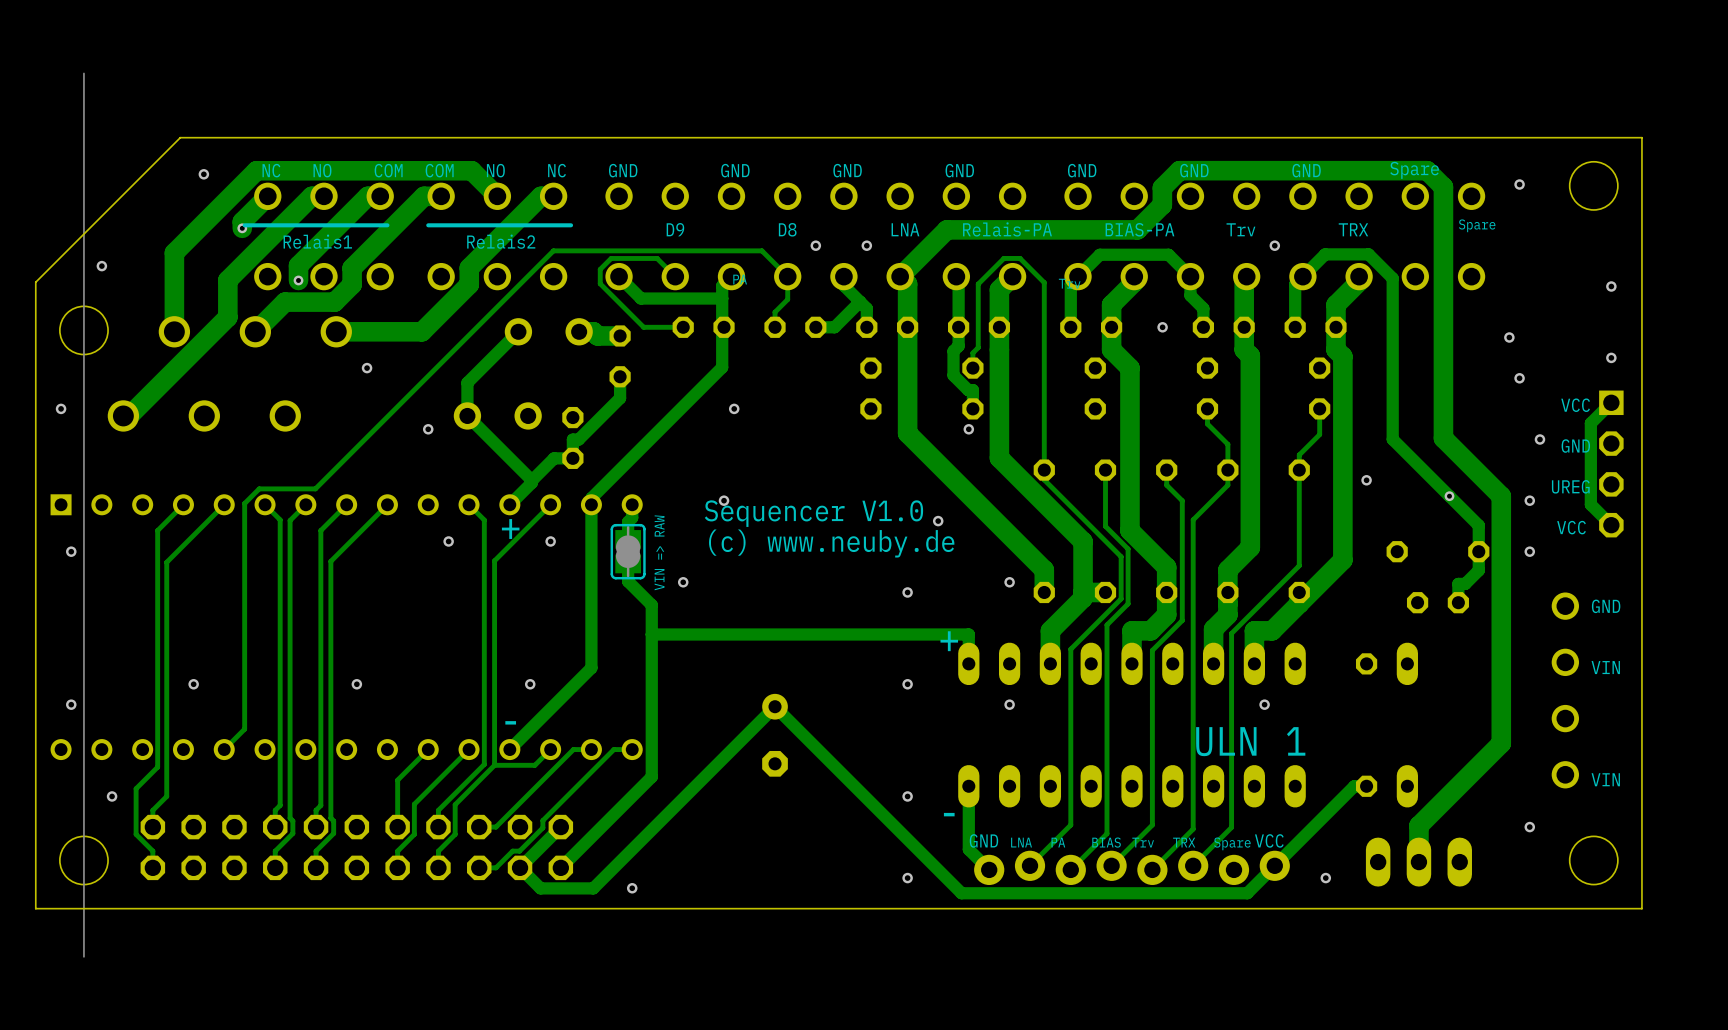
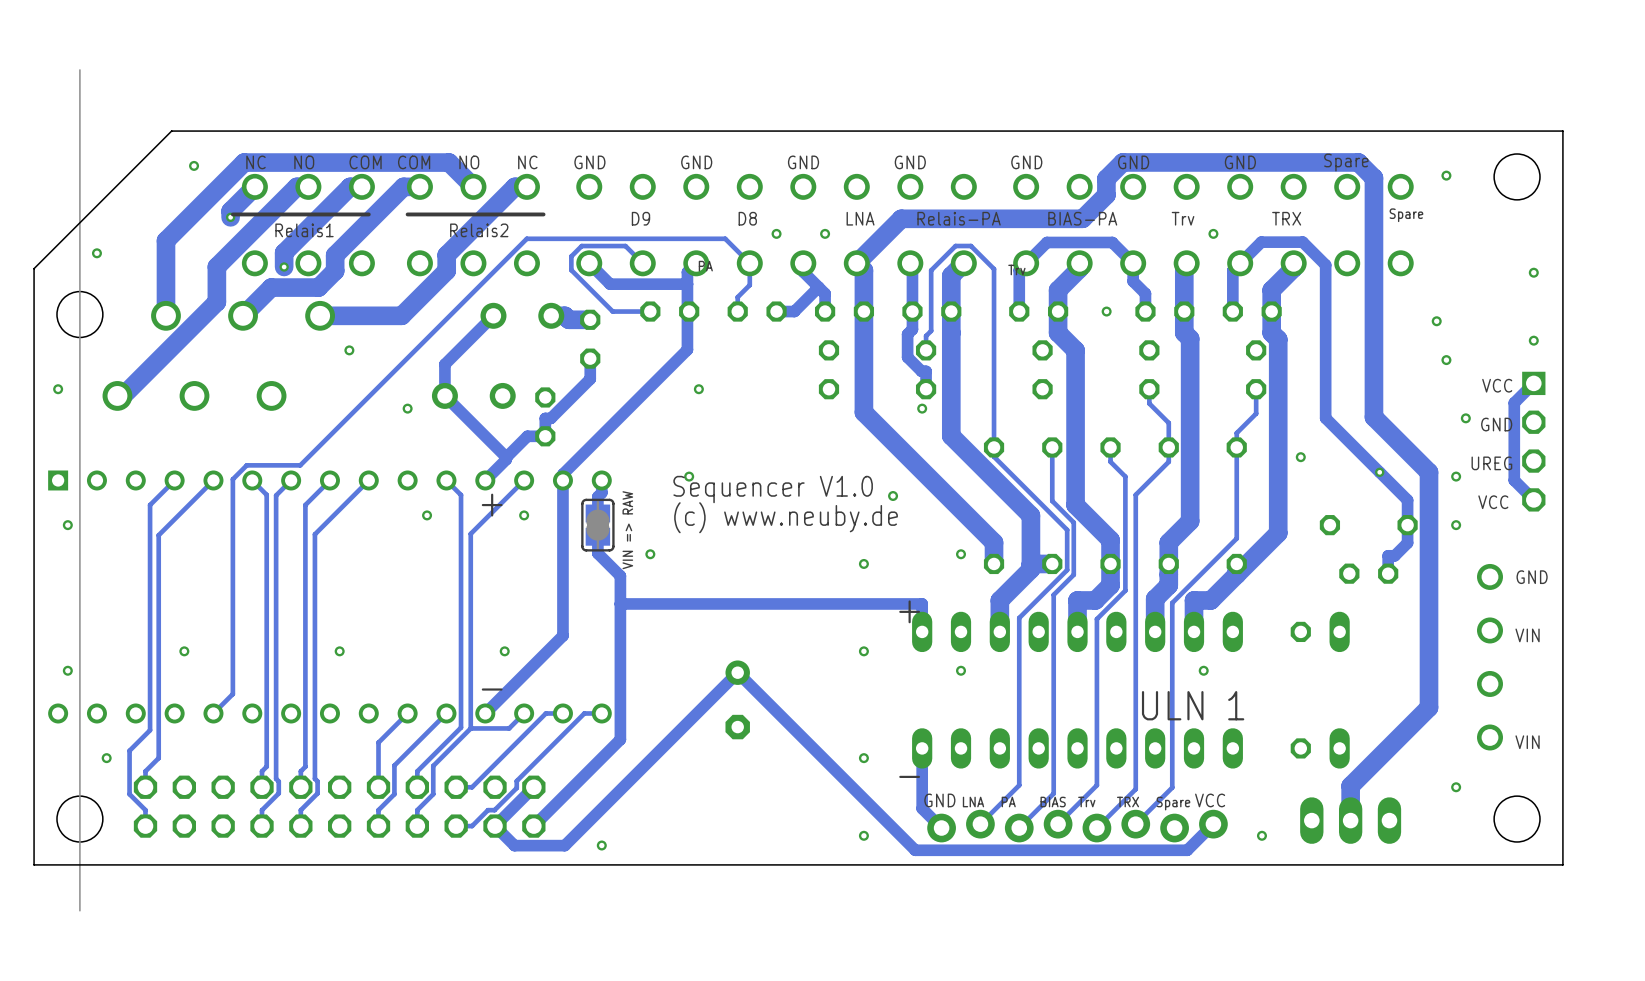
track: (1366, 786) (1354, 786) (1274, 865) -> none

